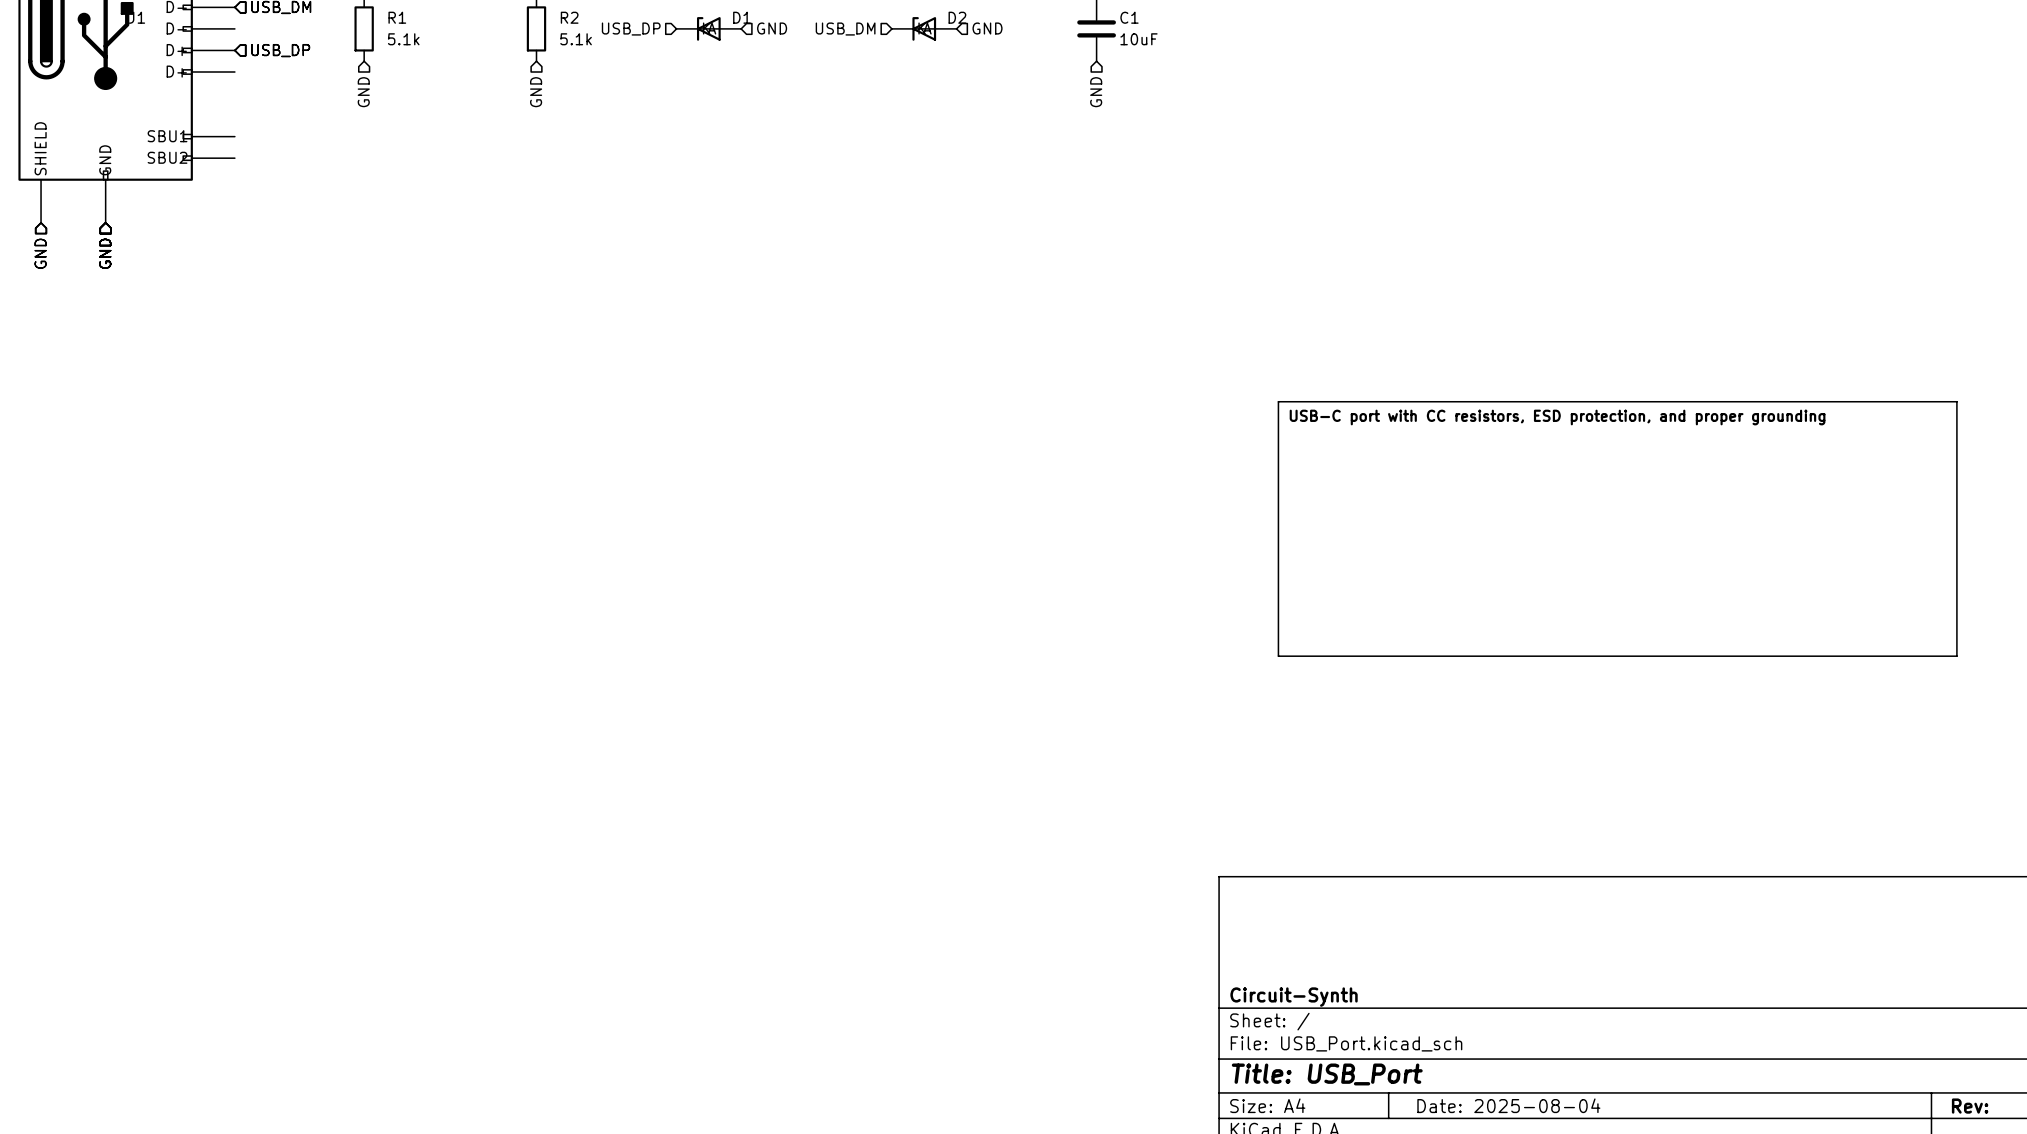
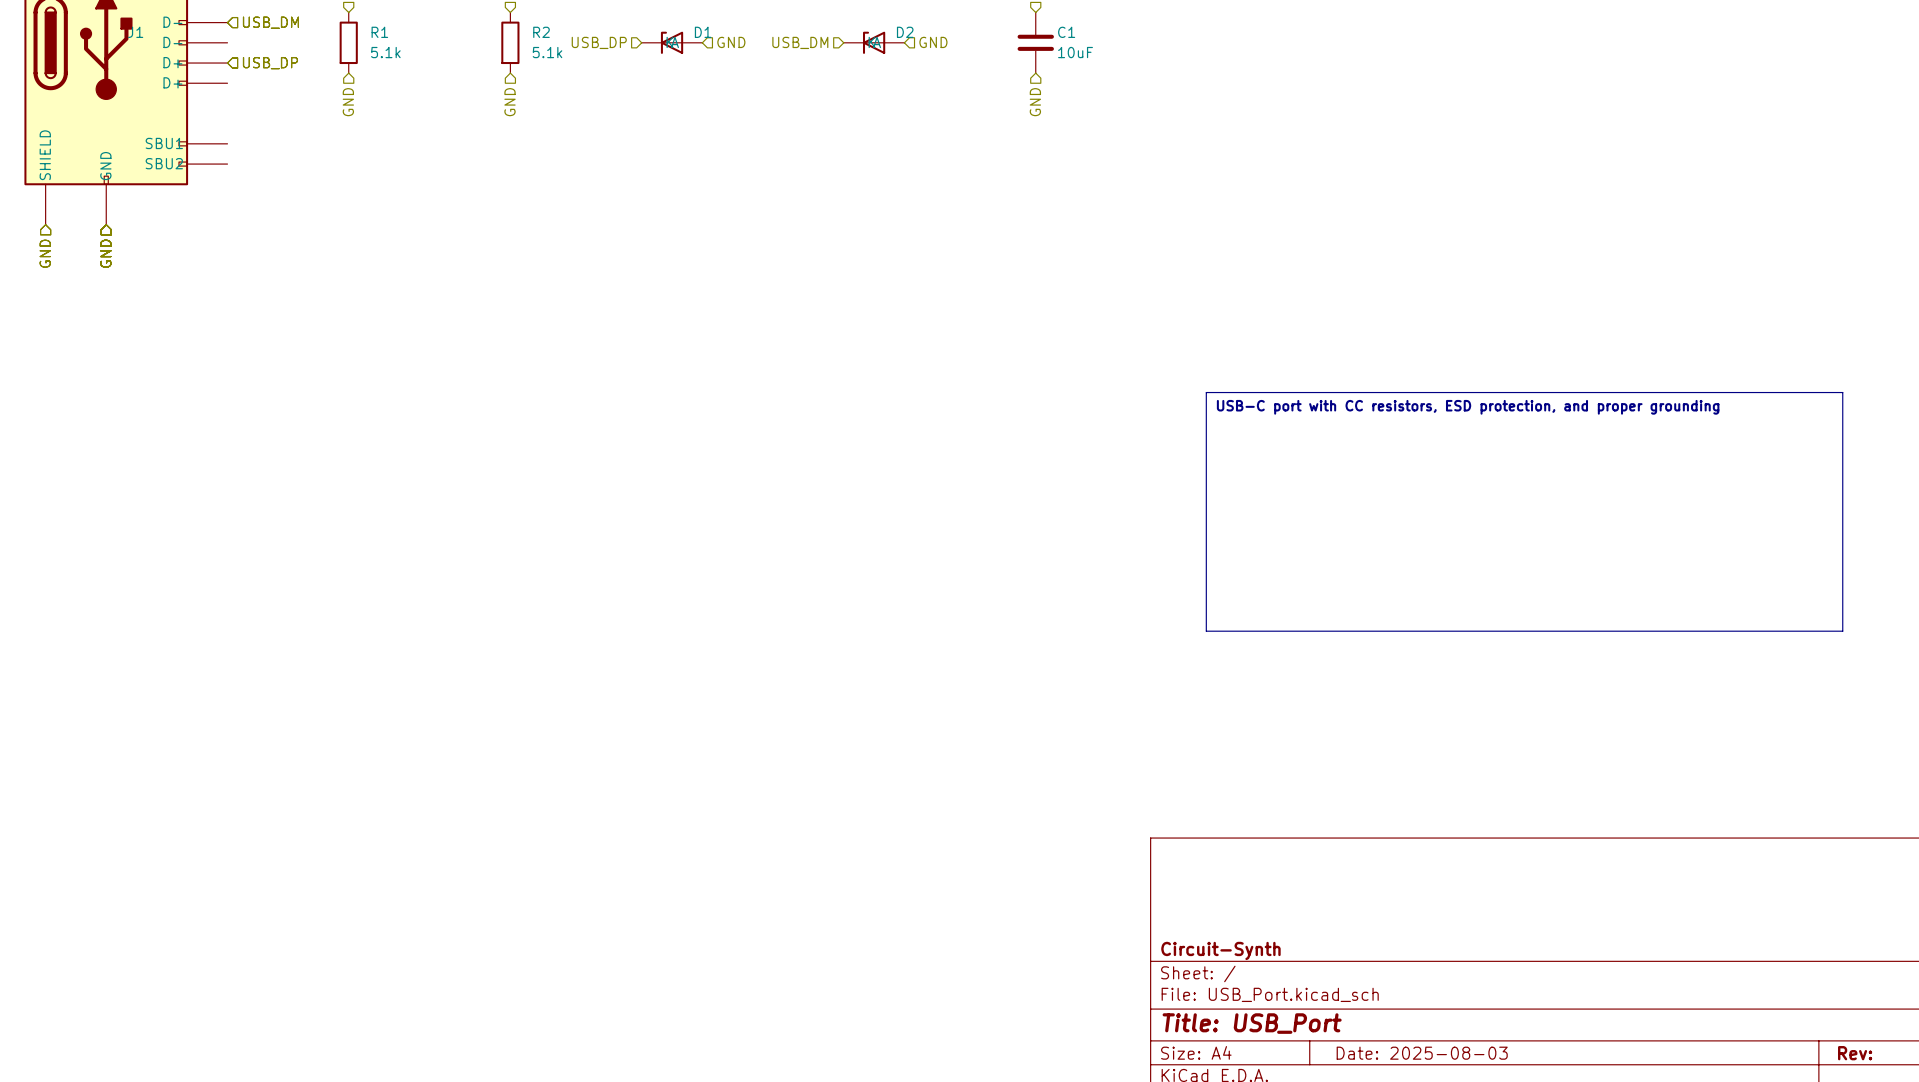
title block: Date: 2025-08-04 (1508, 1105) -> Date: 2025-08-03 (1422, 1053)

